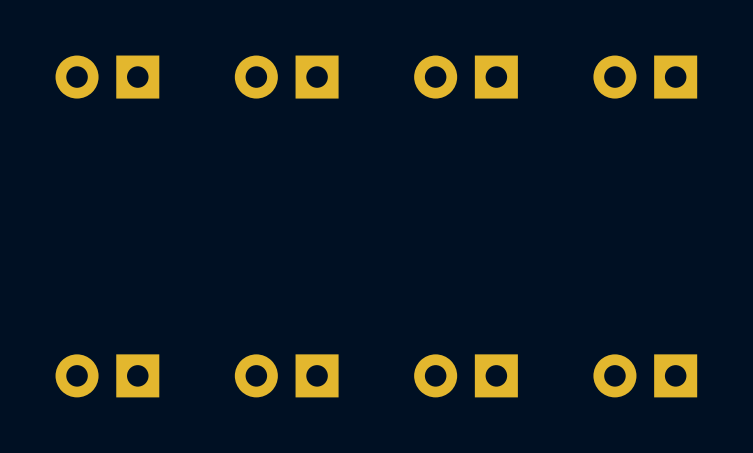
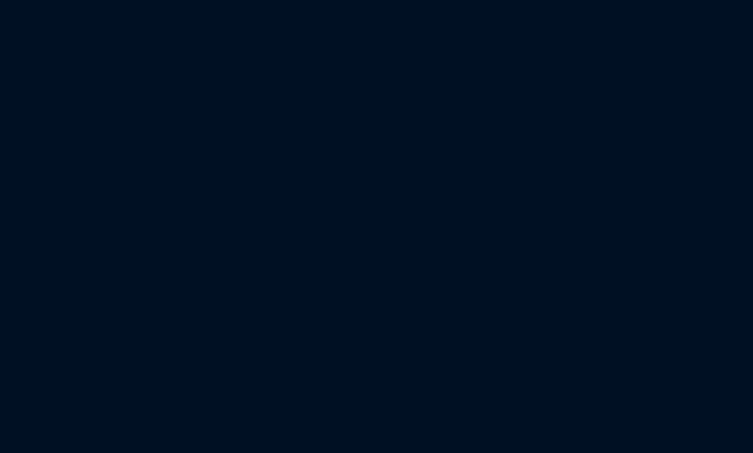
part: (107, 77) -> none
part: (286, 77) -> none
part: (466, 77) -> none
part: (645, 77) -> none
part: (107, 375) -> none
part: (286, 375) -> none
part: (466, 375) -> none
part: (645, 375) -> none

